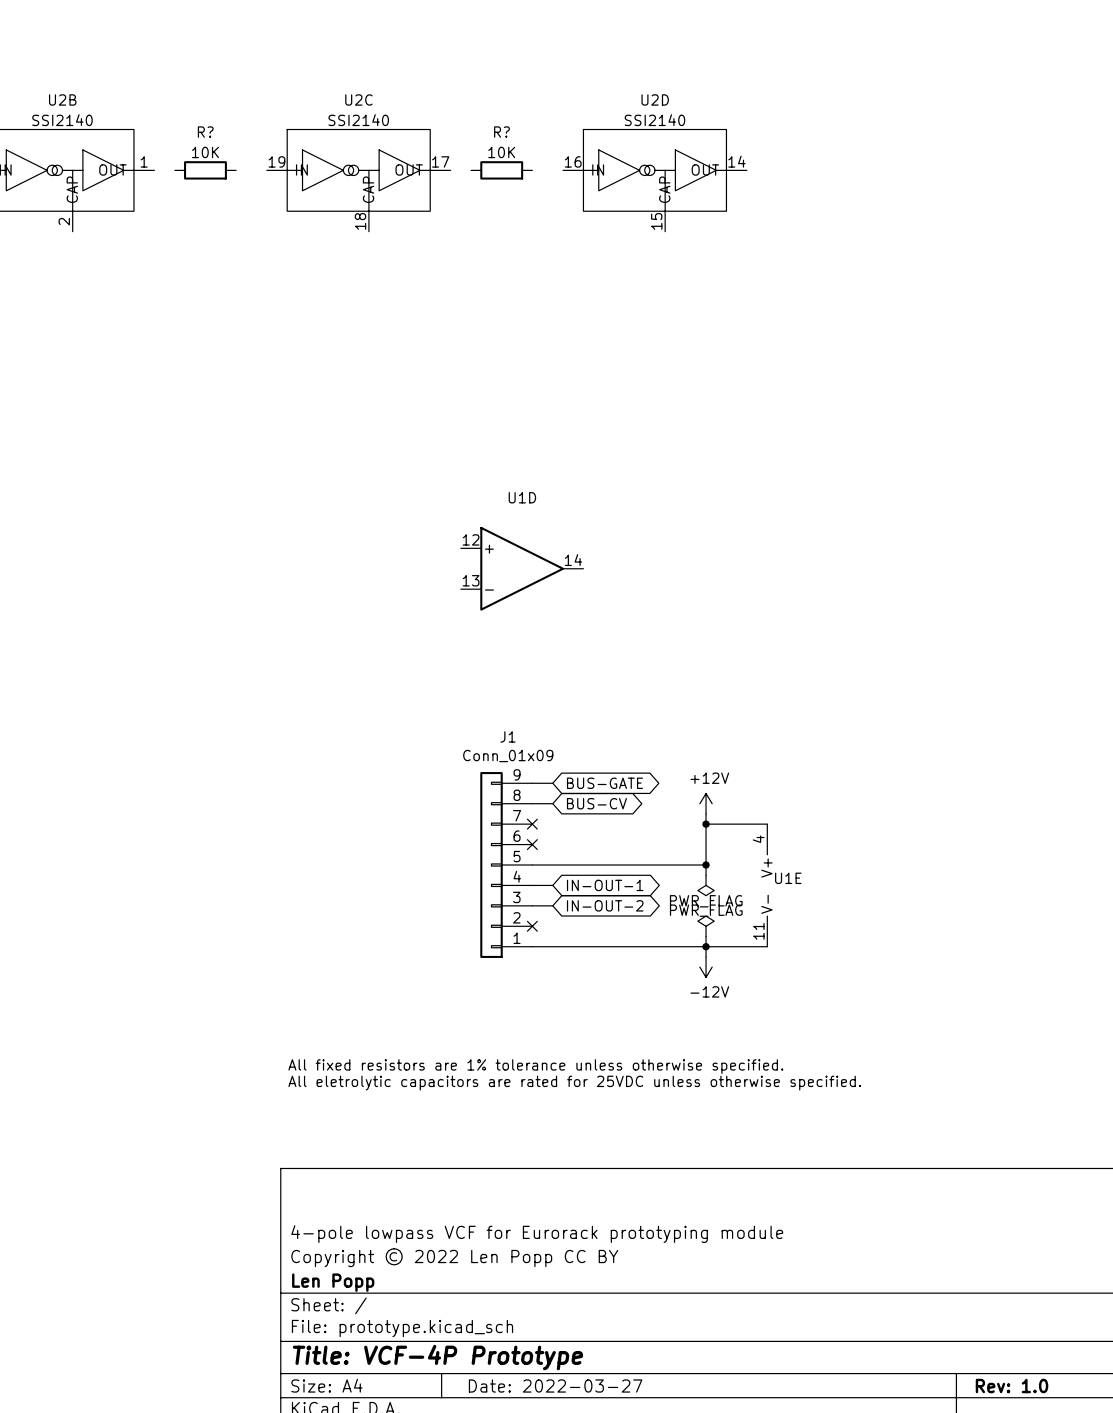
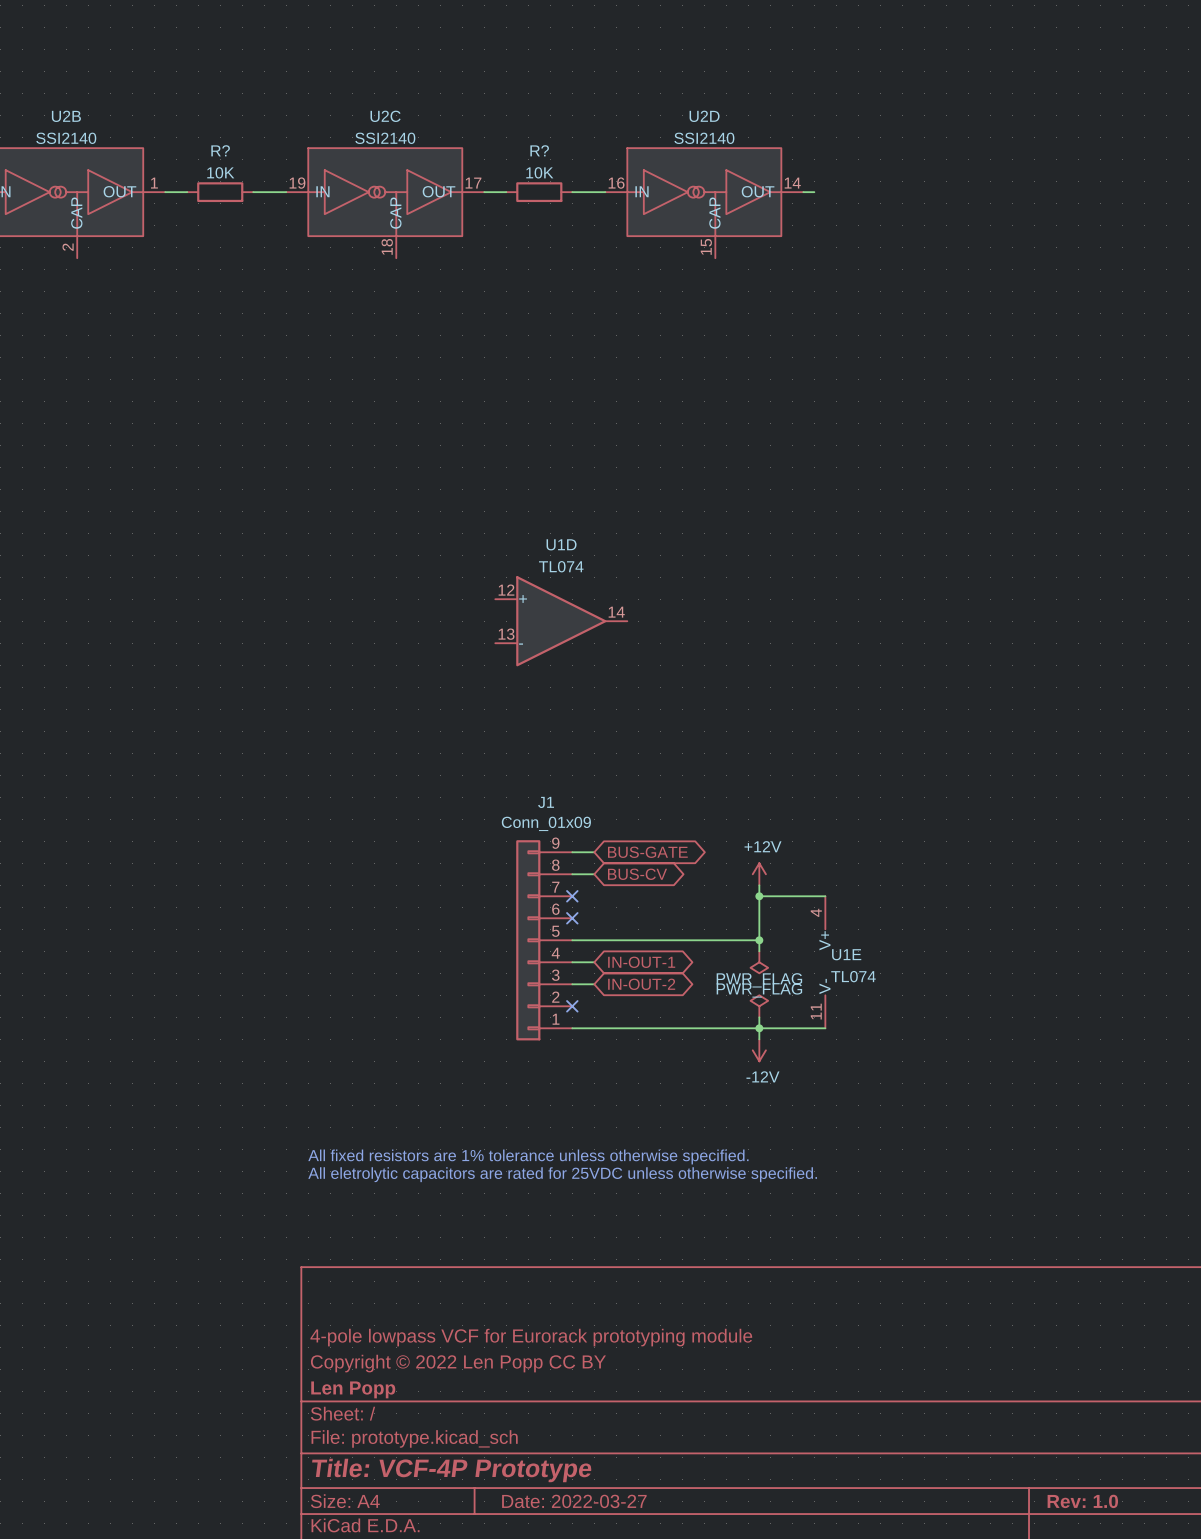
wire: none -> (165, 192) (187, 192)
wire: none -> (253, 192) (286, 192)
wire: none -> (484, 192) (506, 192)
wire: none -> (572, 192) (605, 192)
wire: none -> (803, 192) (814, 192)
U1D value: none -> TL074 (561, 566)
U1E value: none -> TL074 (853, 976)

